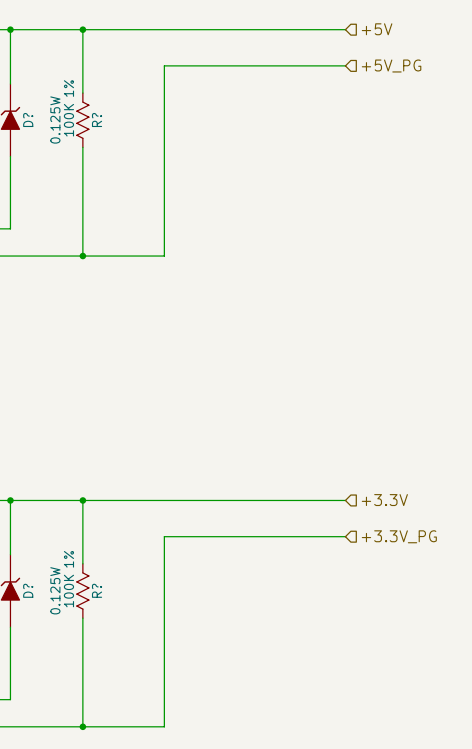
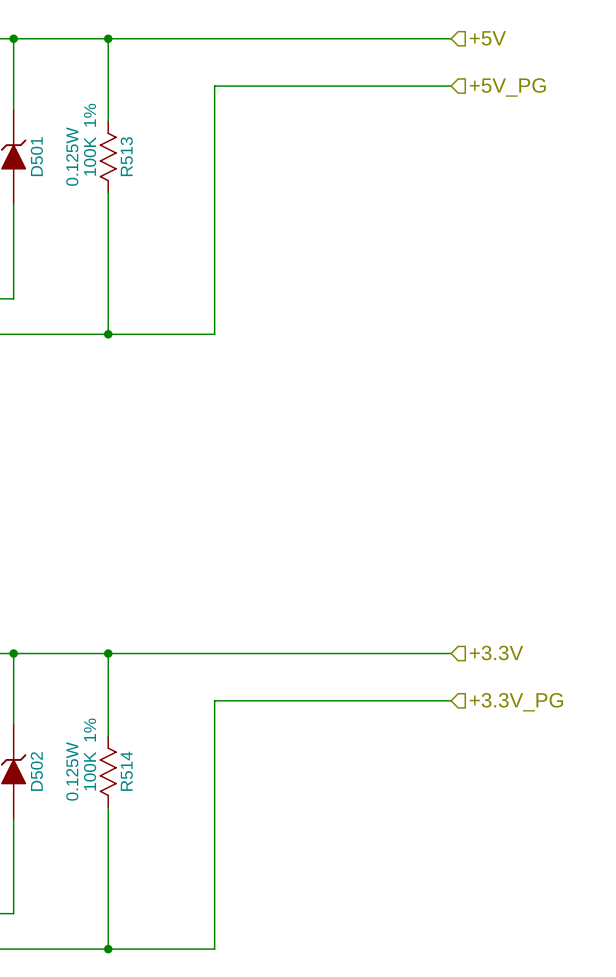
D? name: D? (28, 120) -> D501 (36, 156)
R? name: R? (97, 120) -> R513 (126, 156)
D? name: D? (28, 590) -> D502 (36, 771)
R? name: R? (97, 590) -> R514 (126, 771)

